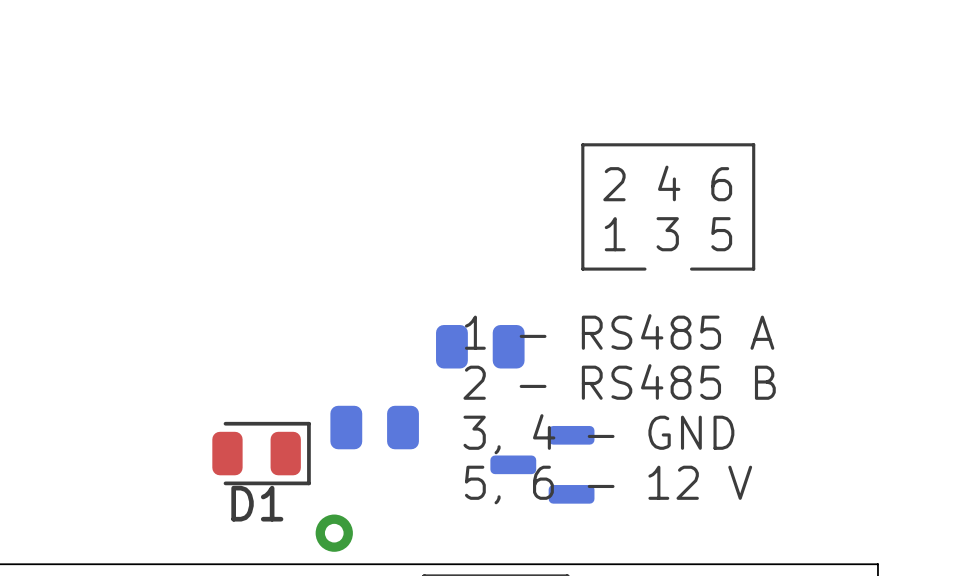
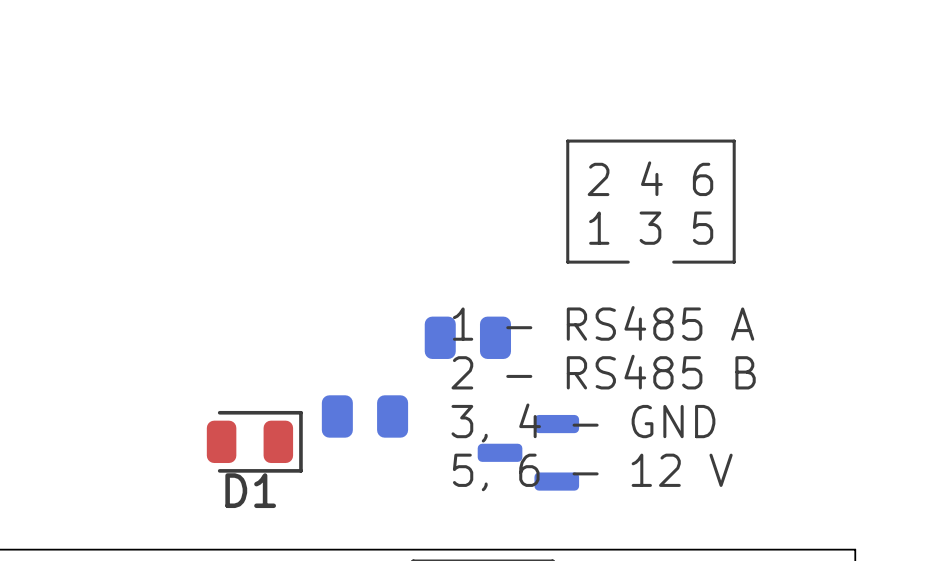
via: (334, 533) -> none

